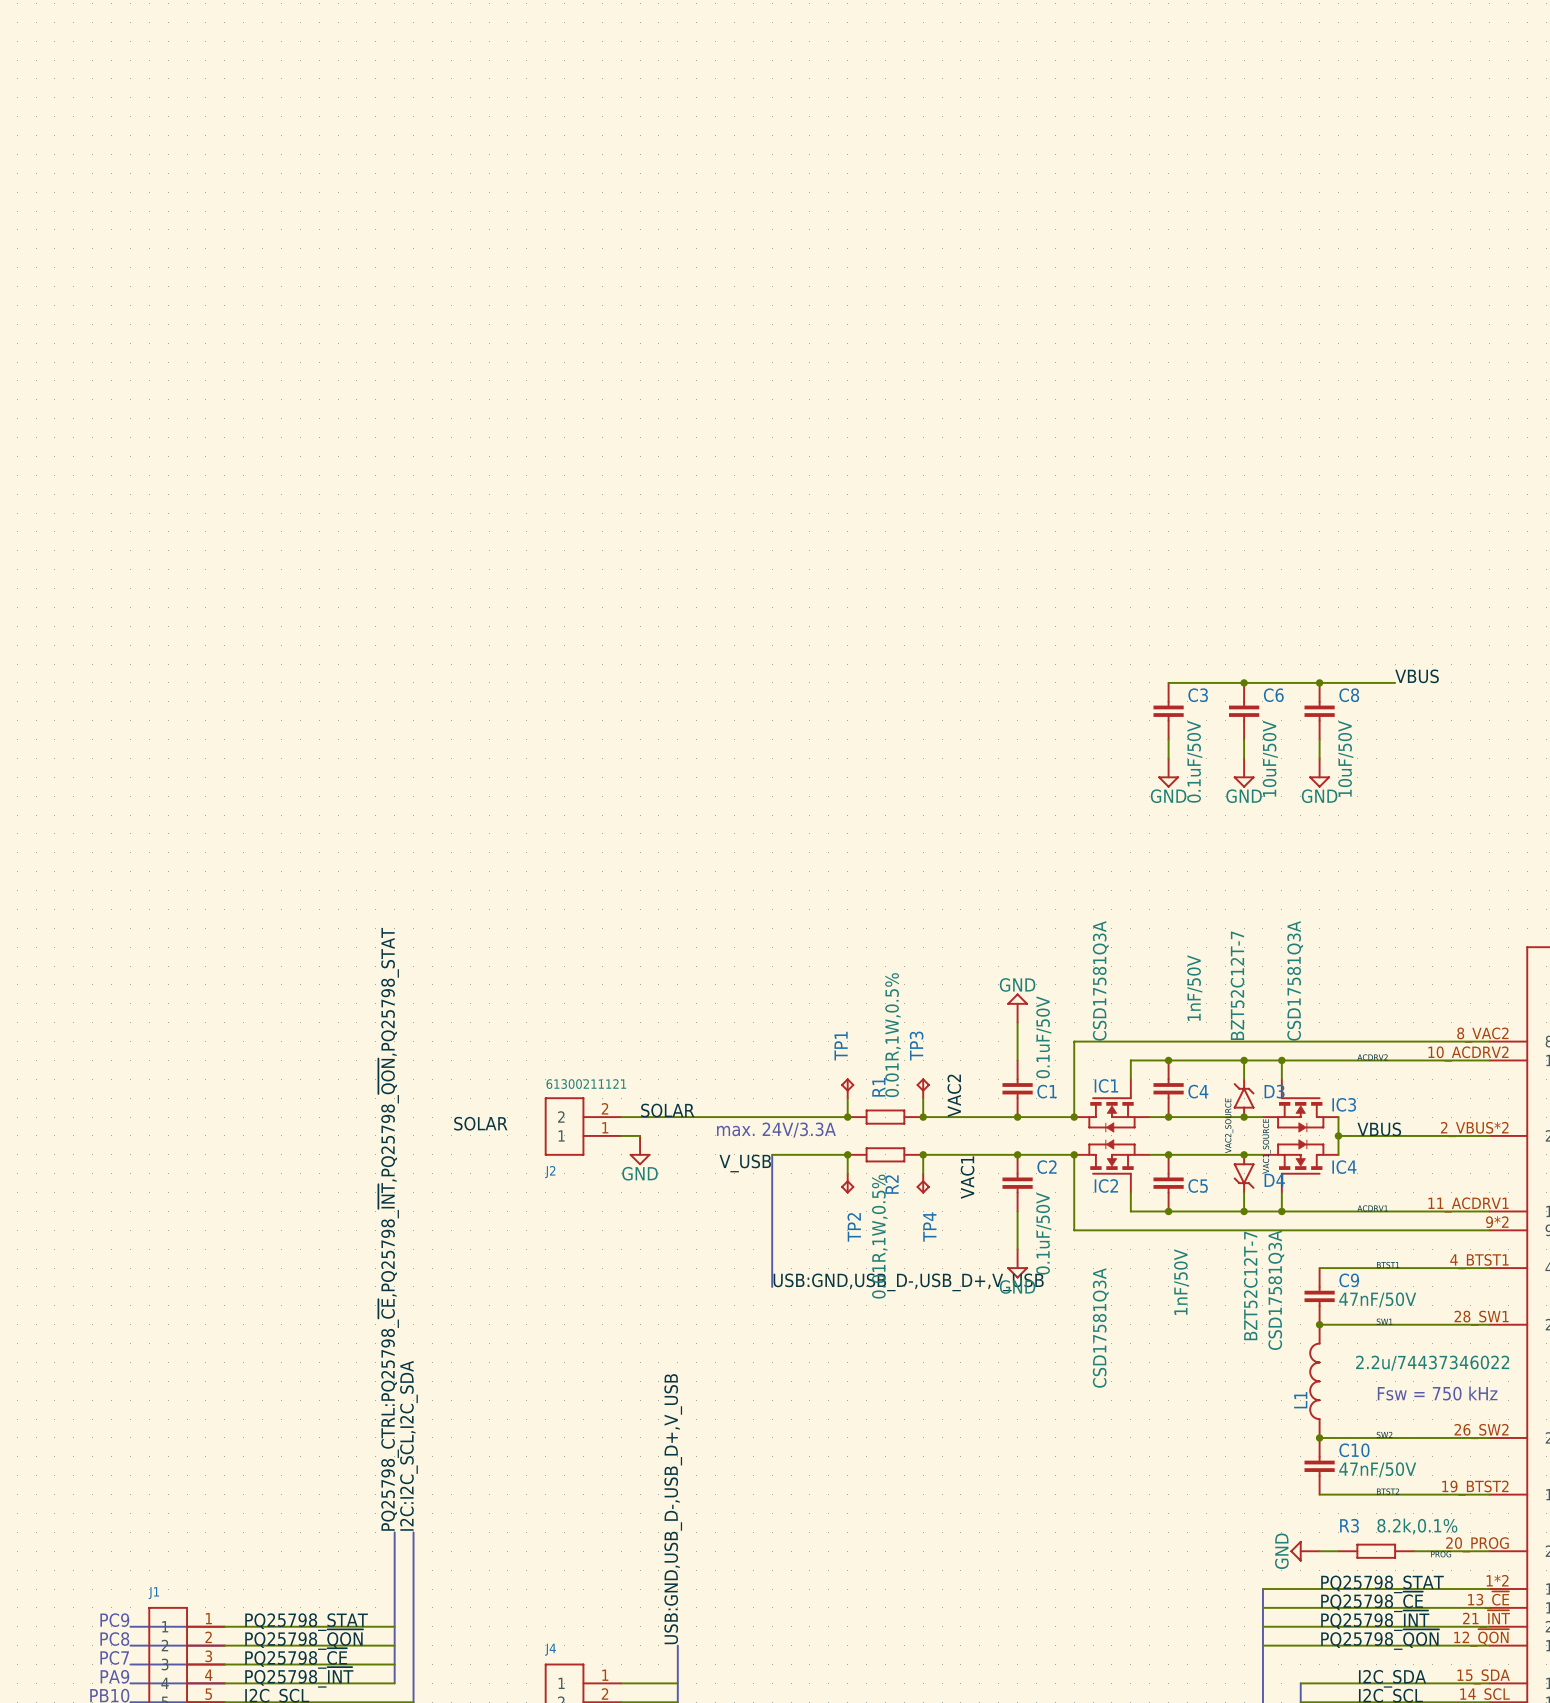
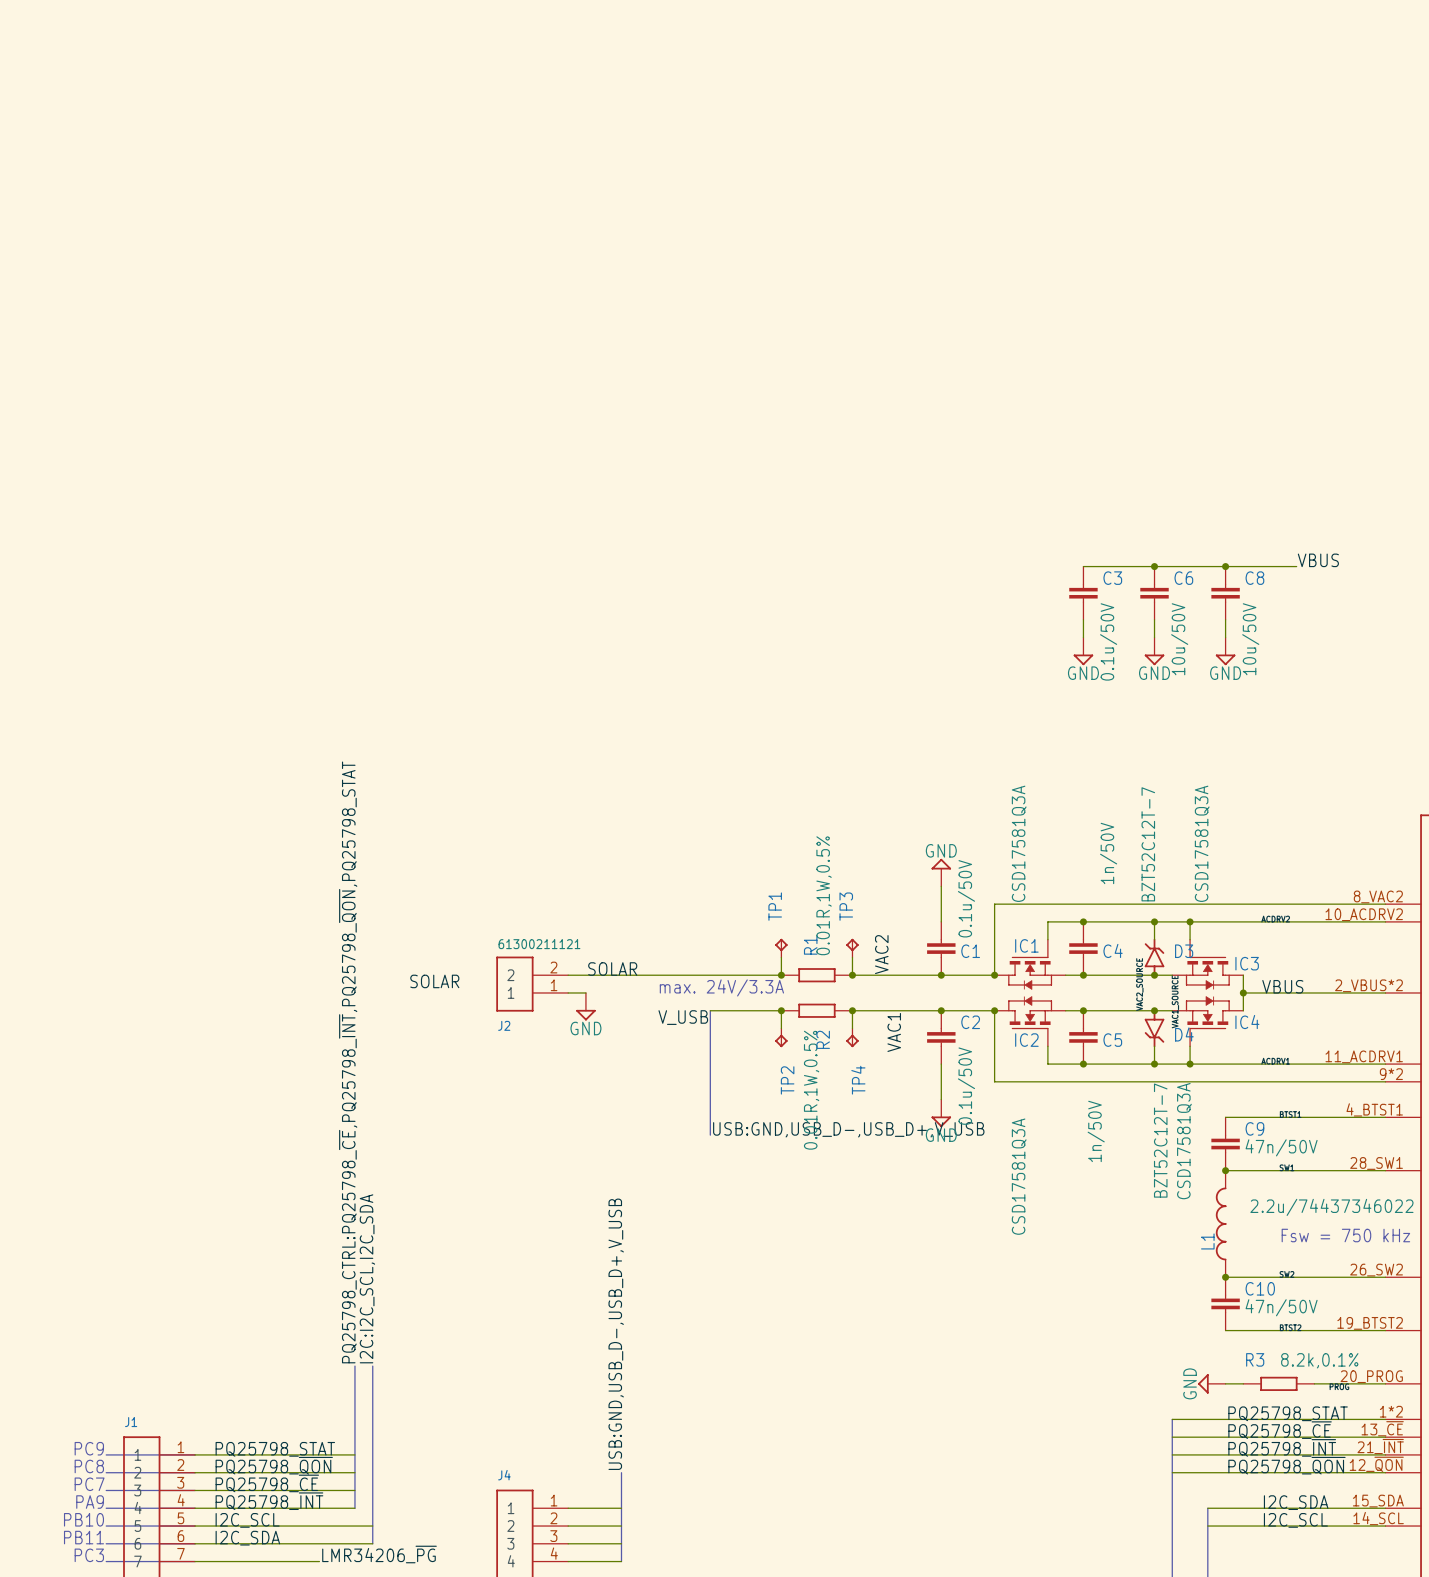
C6 value: 10uF/50V (1270, 758) -> 10u/50V (1179, 639)
C8 value: 10uF/50V (1345, 758) -> 10u/50V (1250, 639)
C3 value: 0.1uF/50V (1194, 761) -> 0.1u/50V (1108, 641)
C4 value: 1nF/50V (1194, 988) -> 1n/50V (1108, 853)
C1 value: 0.1uF/50V (1043, 1037) -> 0.1u/50V (966, 898)
C2 value: 0.1uF/50V (1043, 1233) -> 0.1u/50V (966, 1086)
C5 value: 1nF/50V (1181, 1282) -> 1n/50V (1096, 1131)
C9 value: 47nF/50V (1377, 1299) -> 47n/50V (1281, 1147)
C10 value: 47nF/50V (1377, 1469) -> 47n/50V (1281, 1307)

